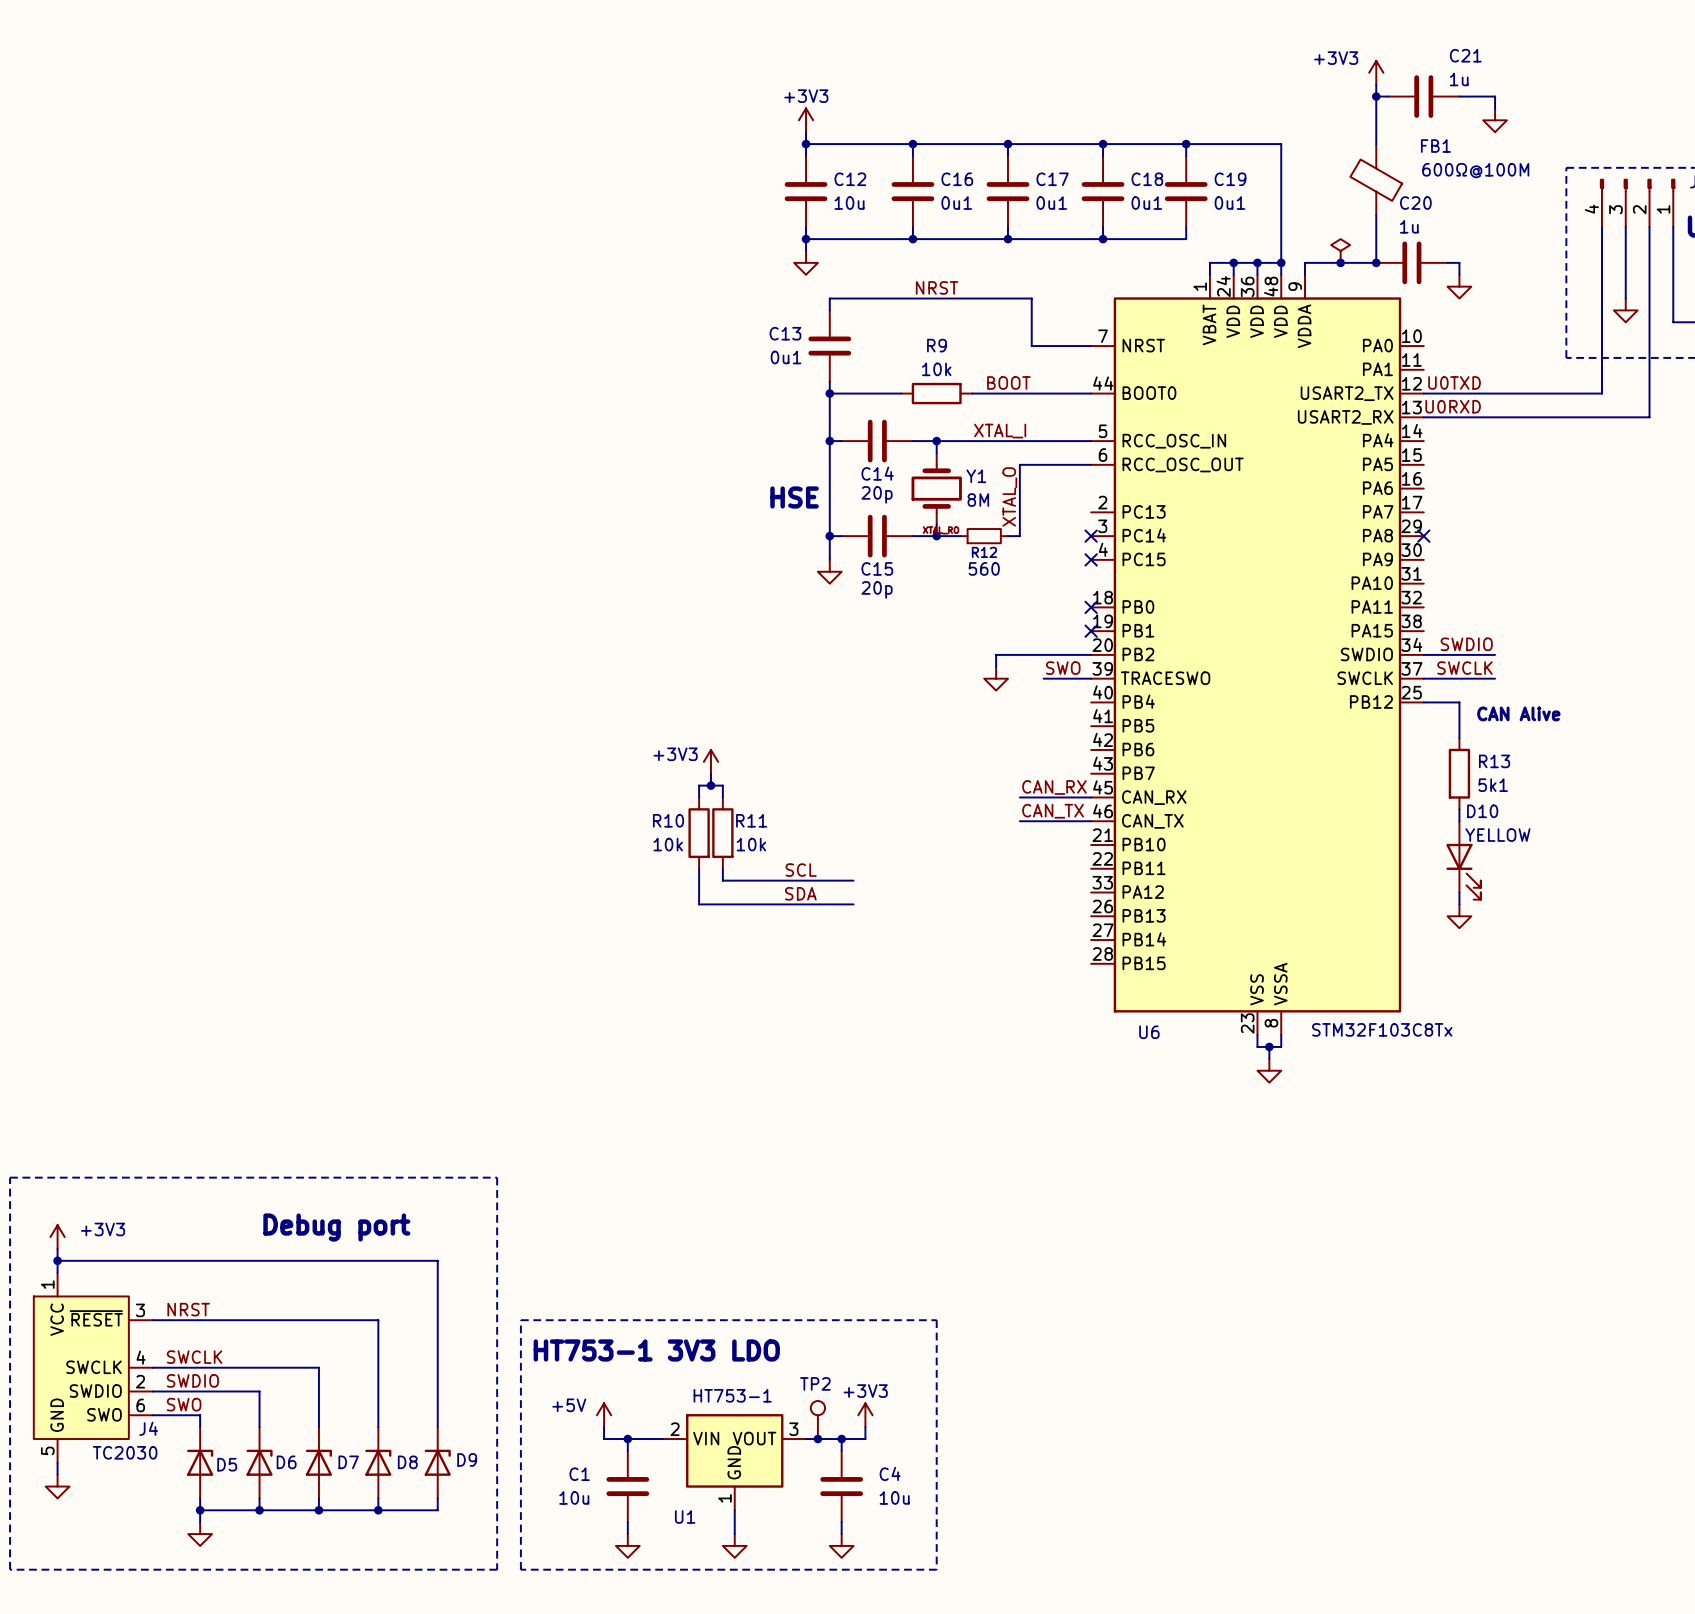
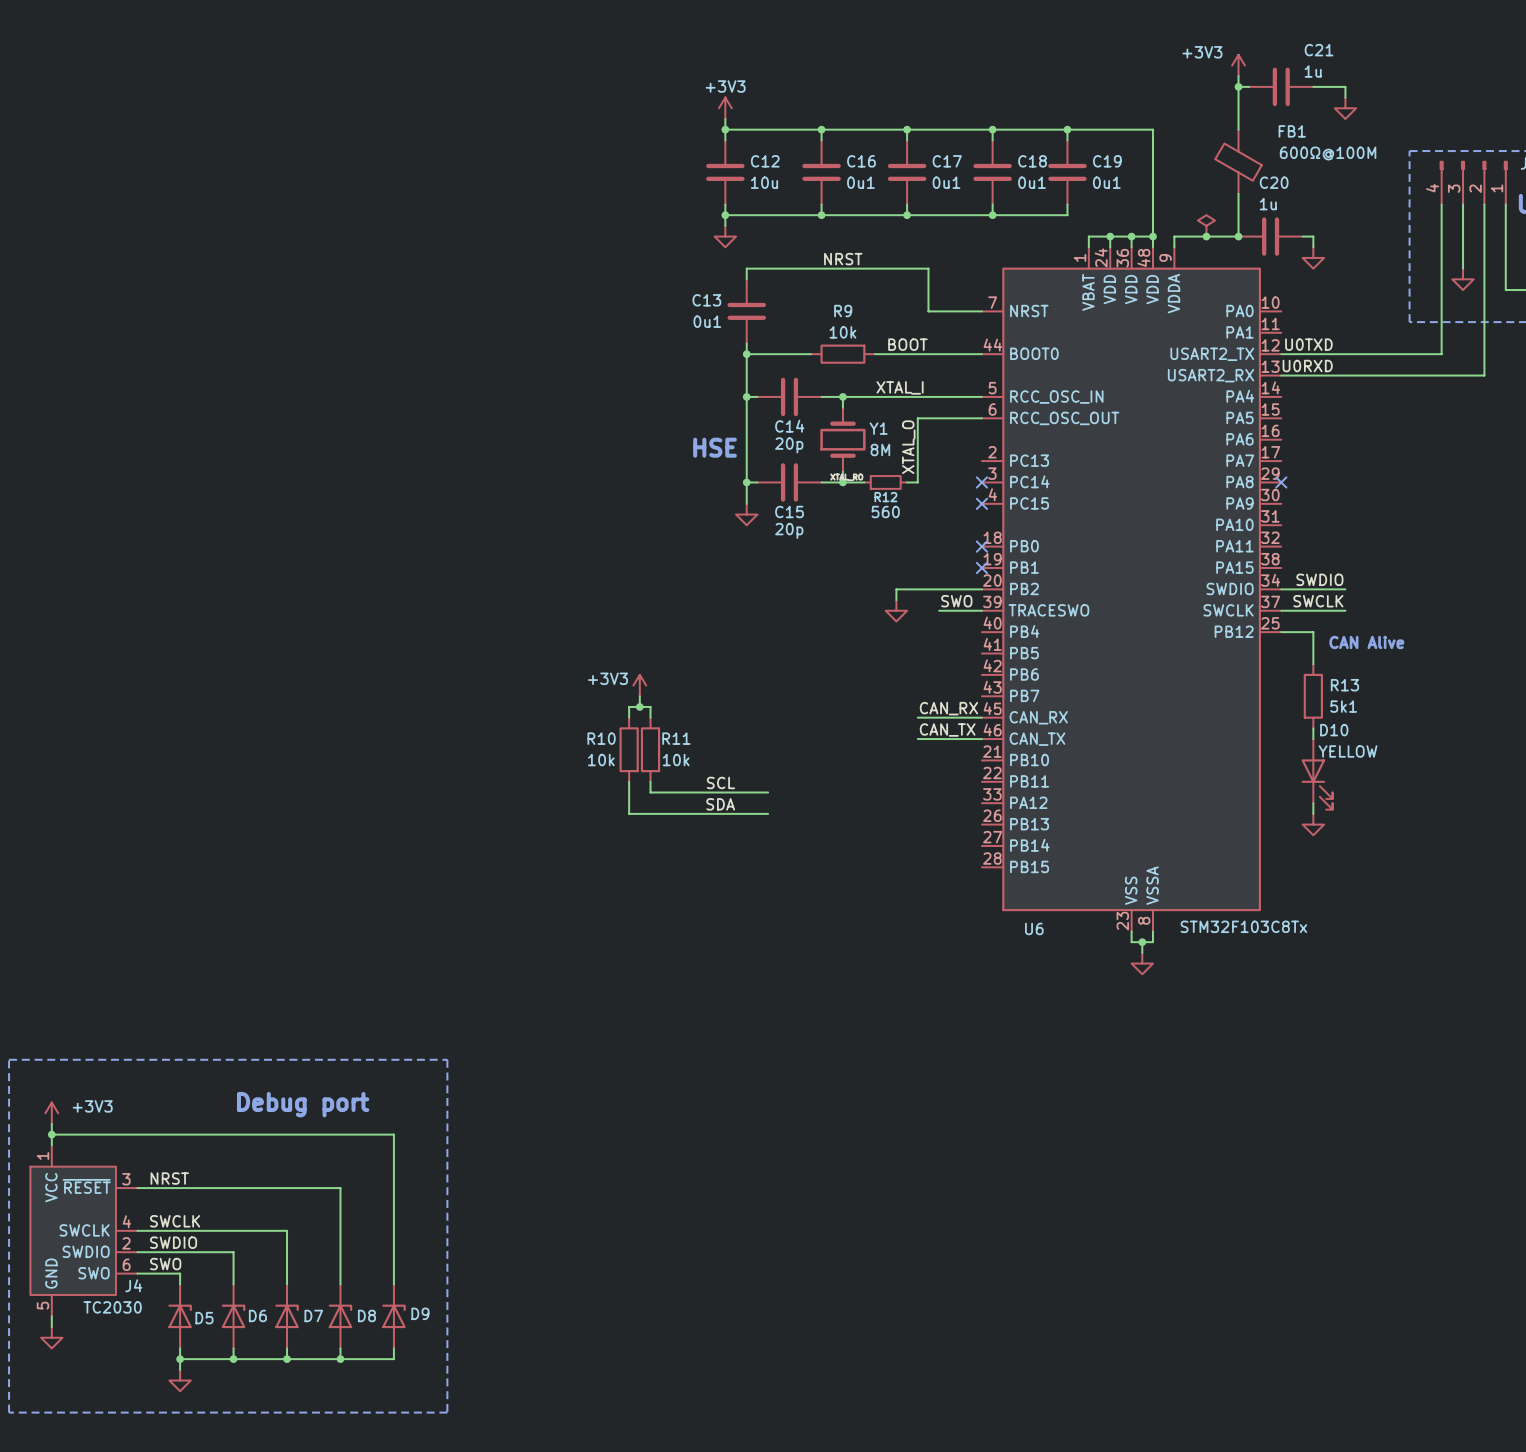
line: (520, 1320) (936, 1320) (936, 1569) (520, 1569) (520, 1320) -> none
text: HT753-1 3V3 LDO (656, 1350) -> none
power symbol: +5V (604, 1415) -> none
power symbol: +3V3 (865, 1415) -> none
TP2: (817, 1420) -> none
wire: (604, 1427) (604, 1439) (663, 1439) -> none
wire: (865, 1427) (865, 1439) (806, 1439) -> none
wire: (627, 1439) (627, 1450) -> none
junction: (627, 1439) -> none
junction: (817, 1439) -> none
wire: (841, 1439) (841, 1450) -> none
junction: (841, 1439) -> none
U1: HT753-1 (734, 1462) -> none
C1: 10u (627, 1486) -> none
C4: 10u (841, 1486) -> none
wire: (734, 1510) (734, 1534) -> none
wire: (627, 1522) (627, 1534) -> none
wire: (841, 1522) (841, 1534) -> none
power symbol: (627, 1545) -> none
power symbol: (734, 1545) -> none
power symbol: (841, 1545) -> none

